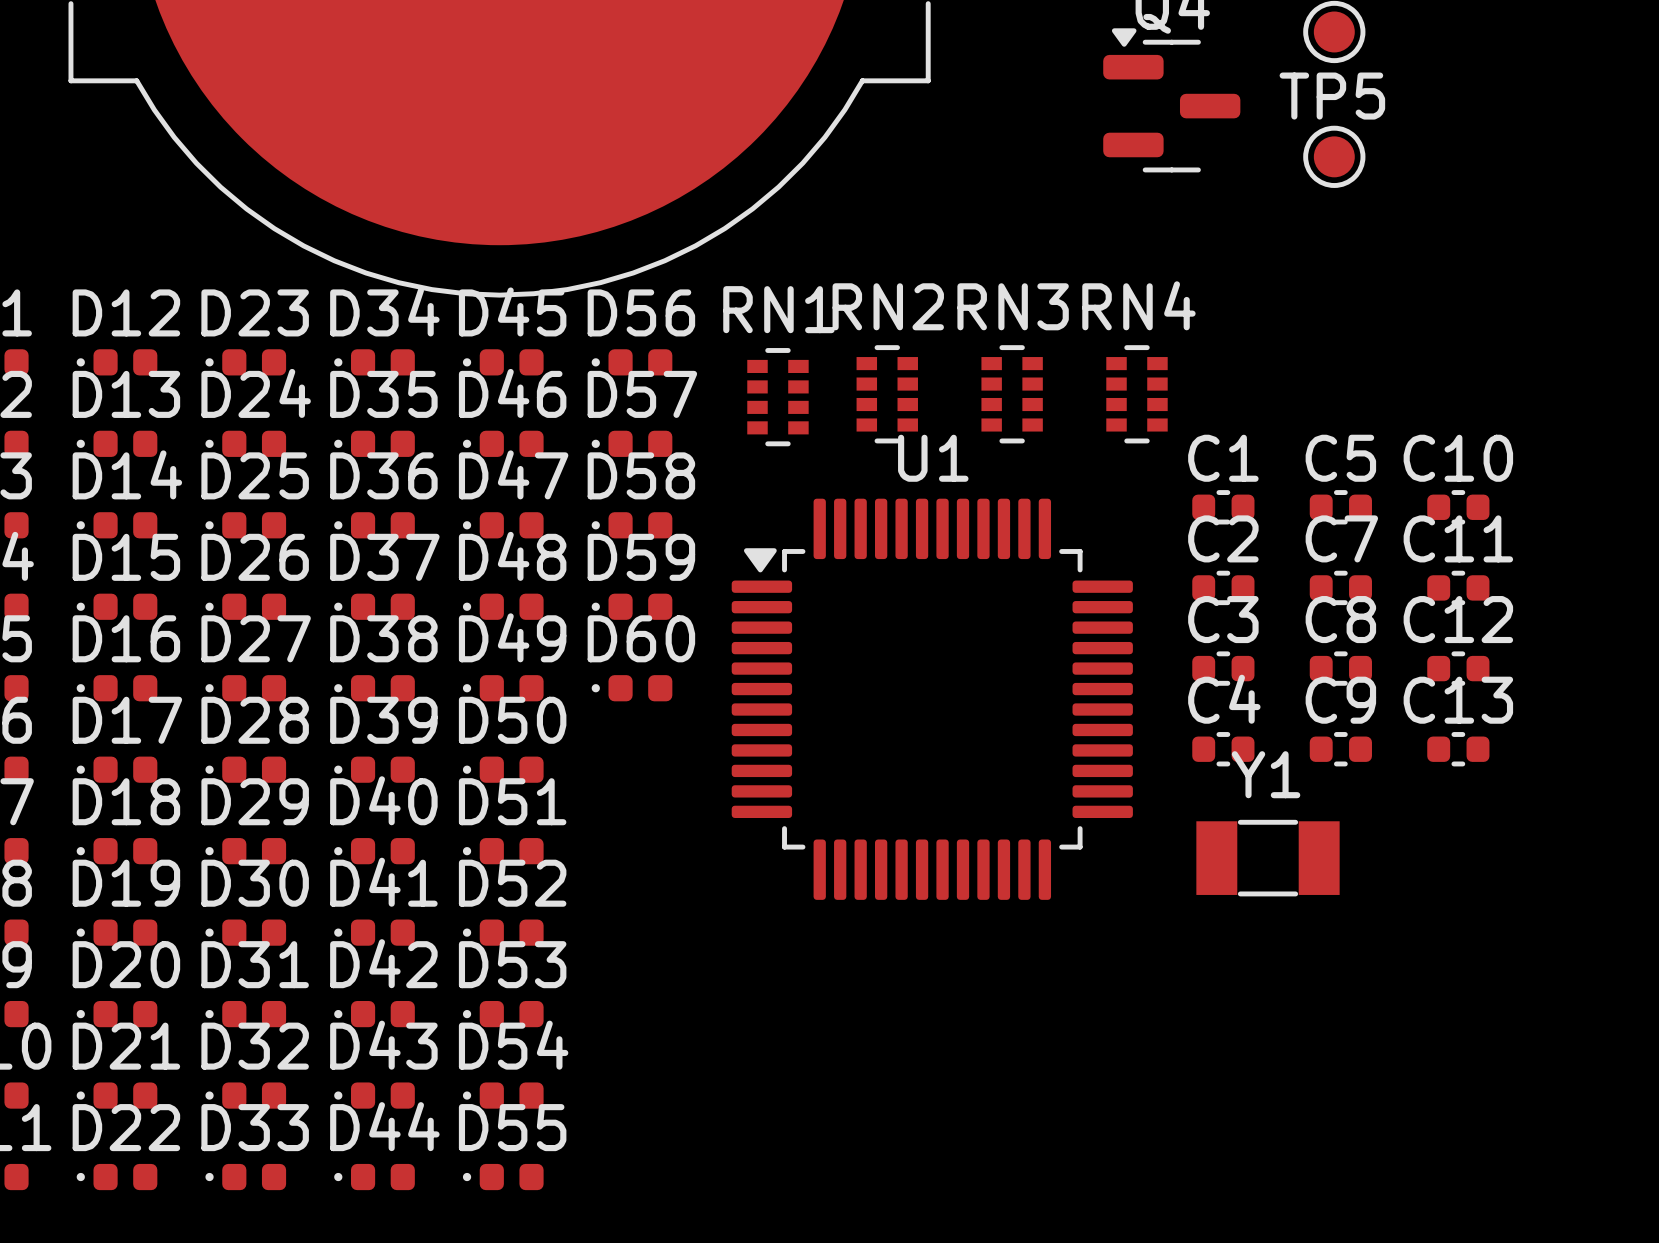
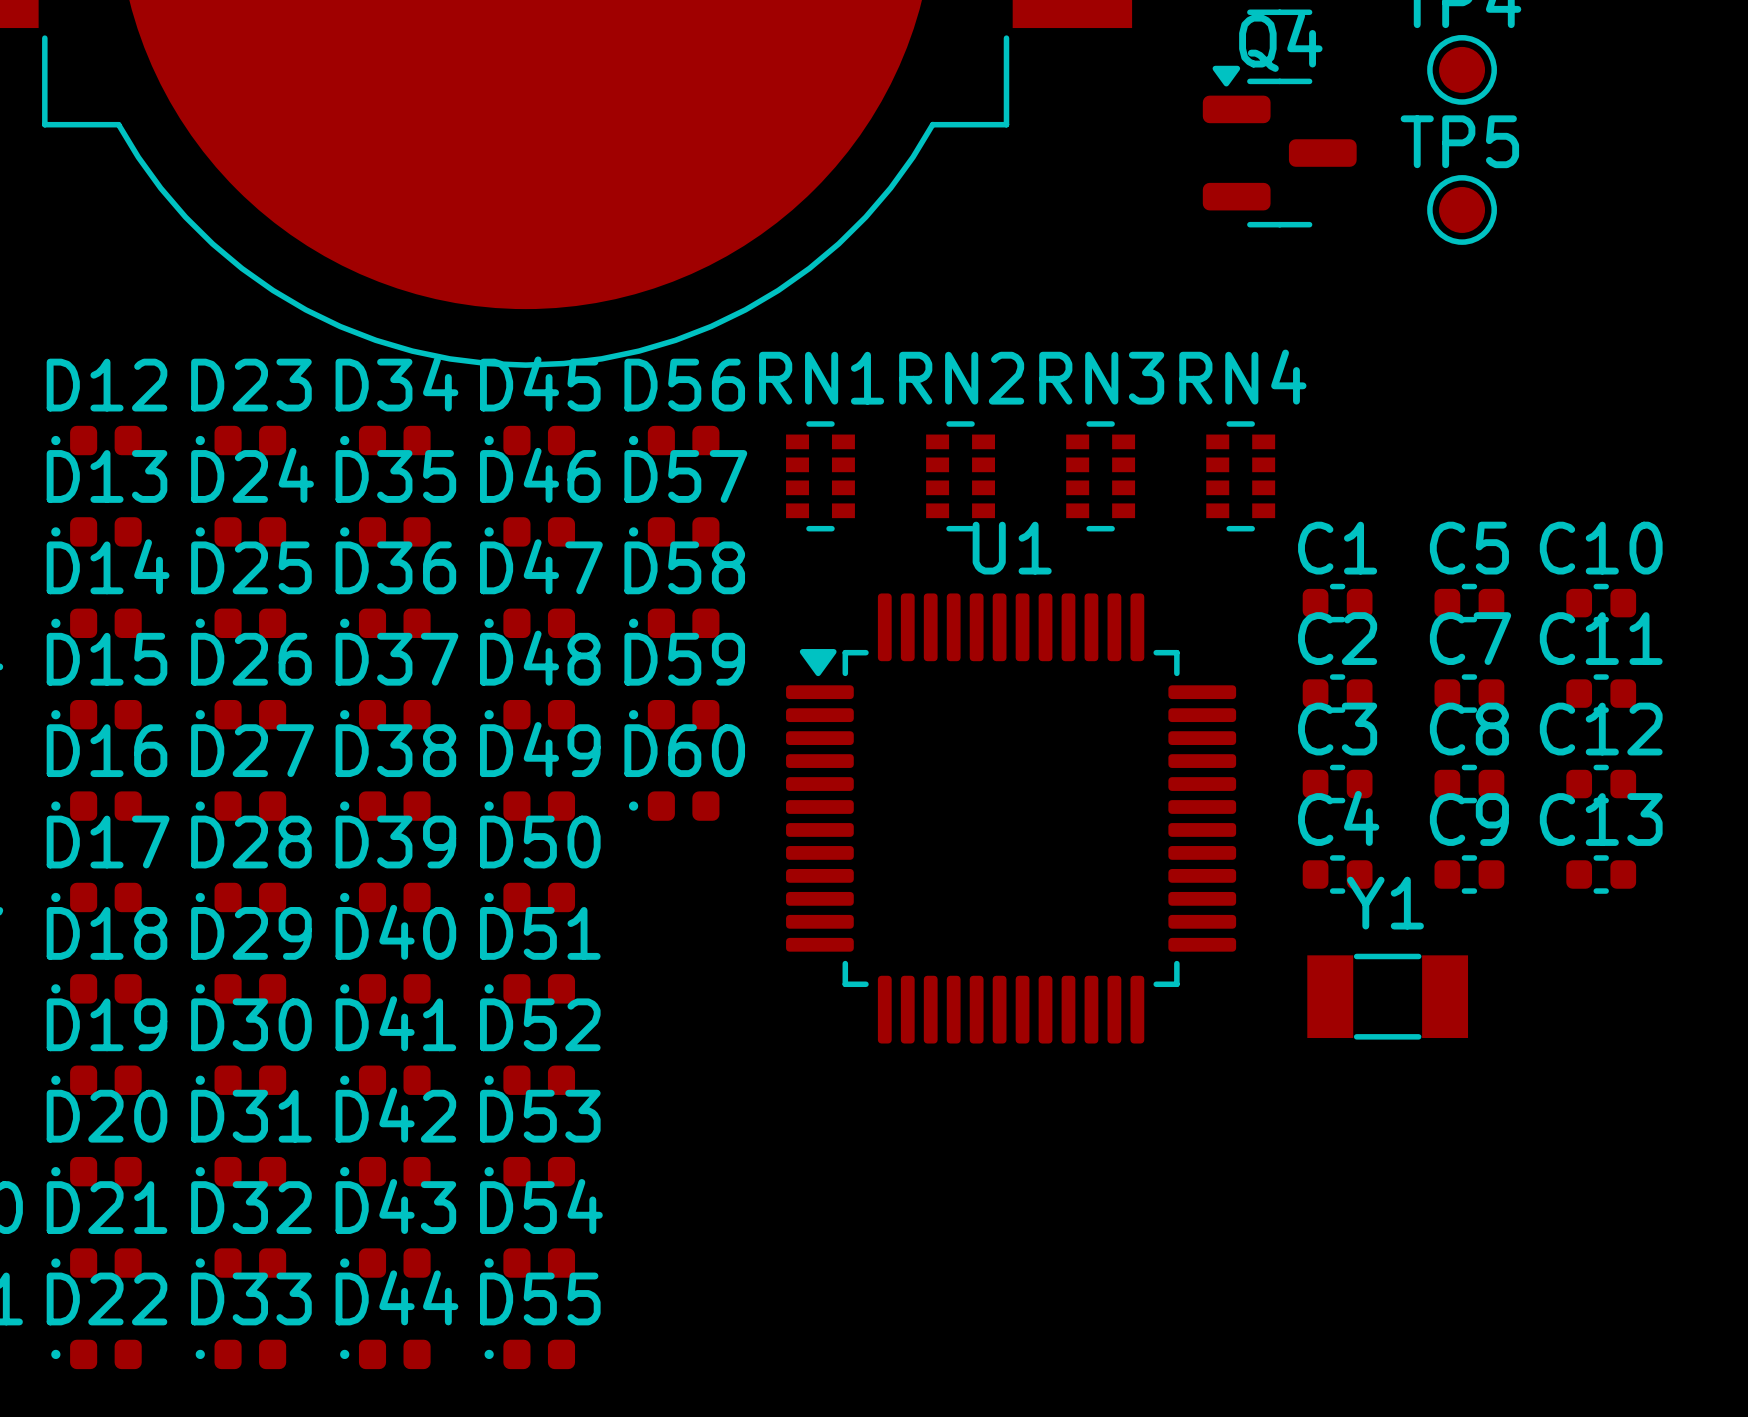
RN1 position: (777, 397) -> (820, 476)

